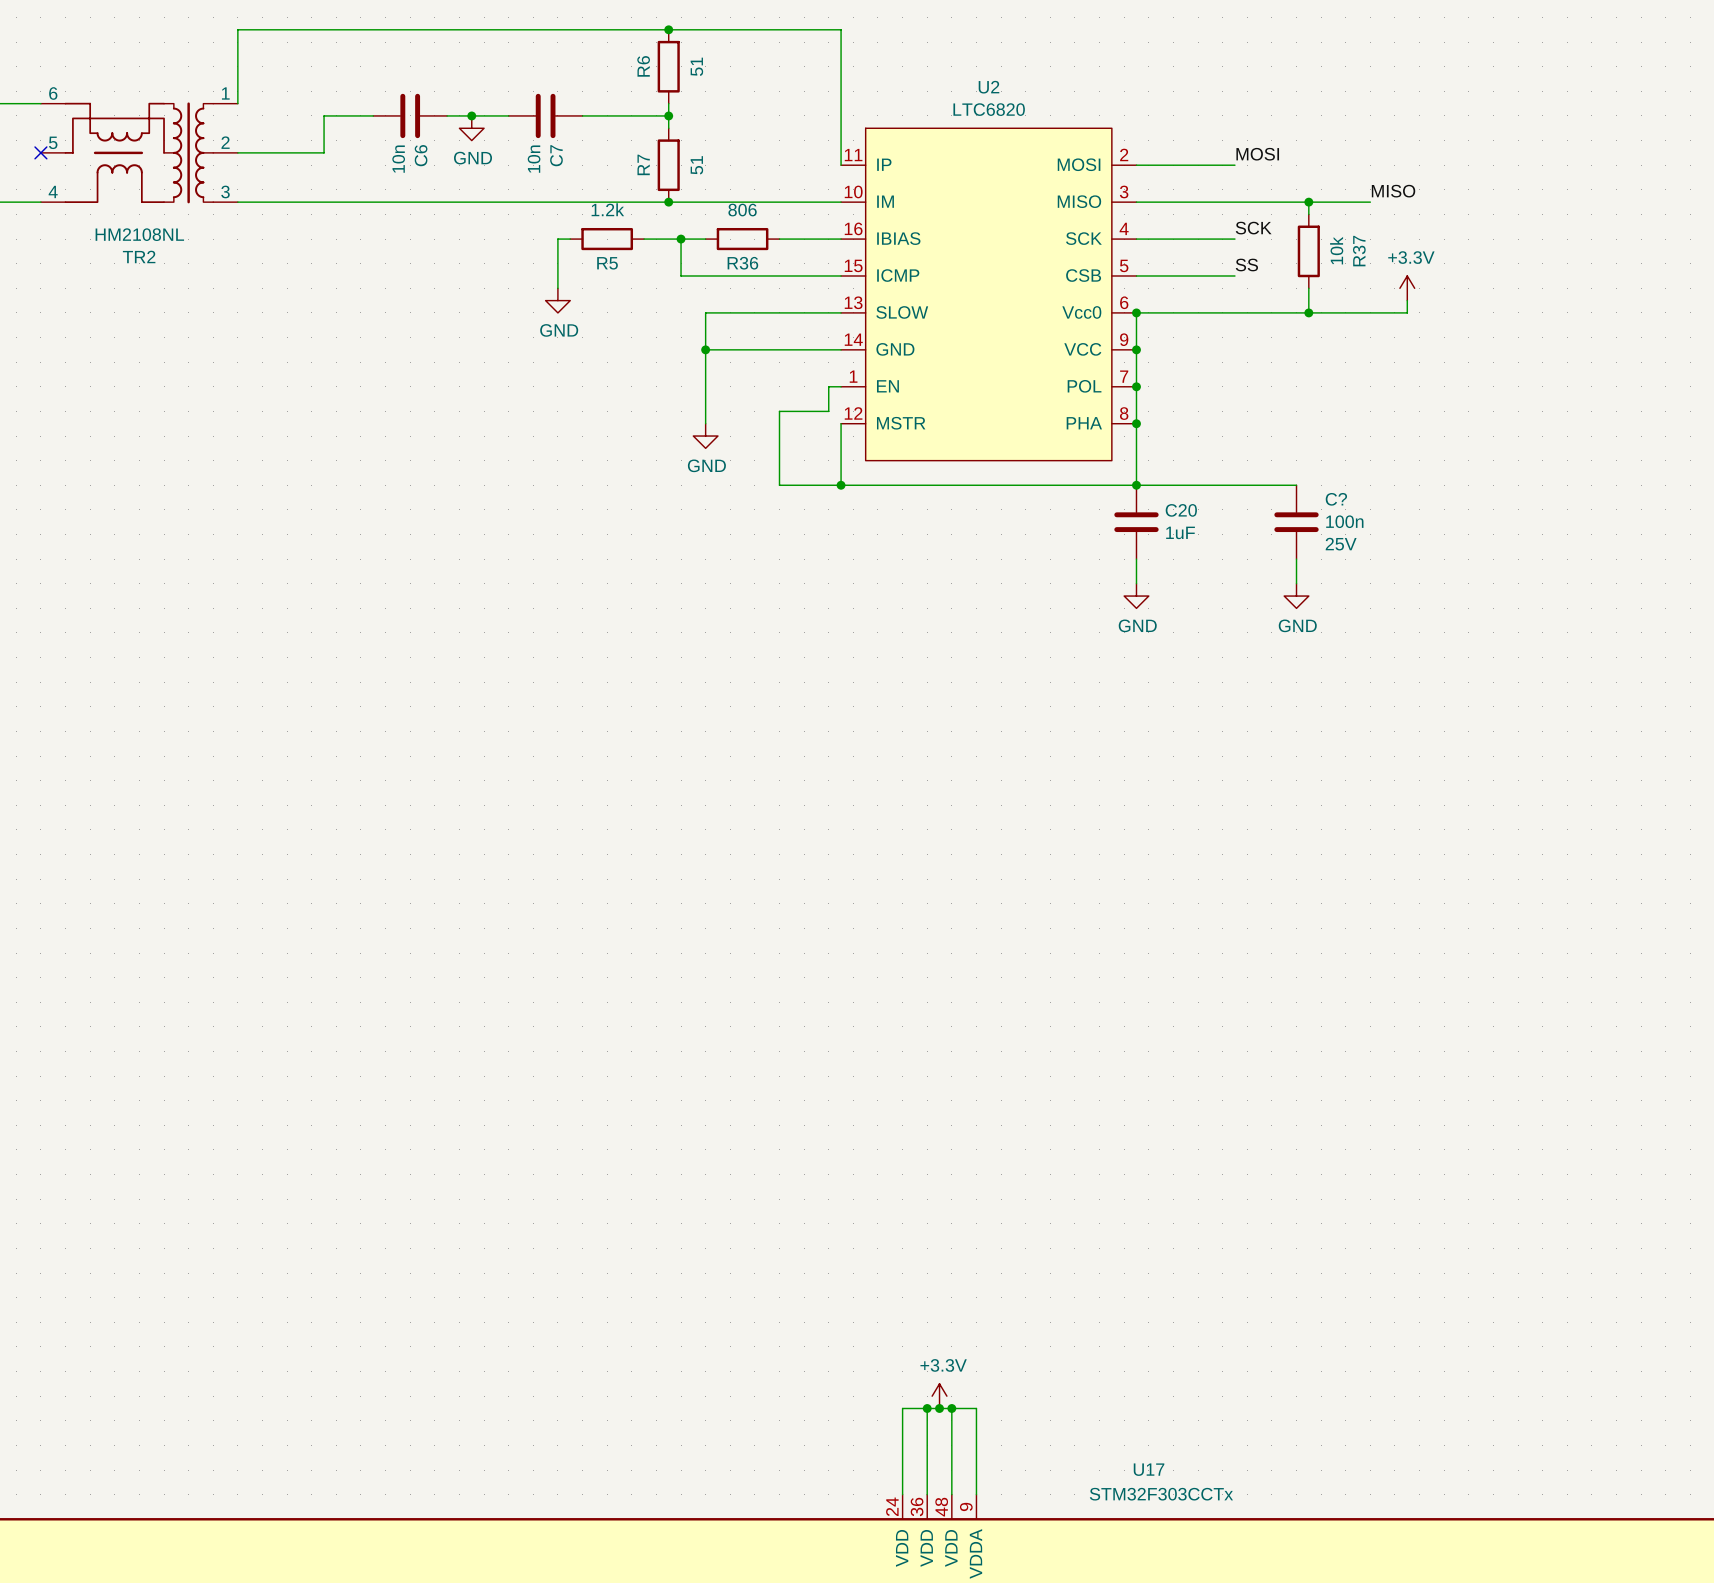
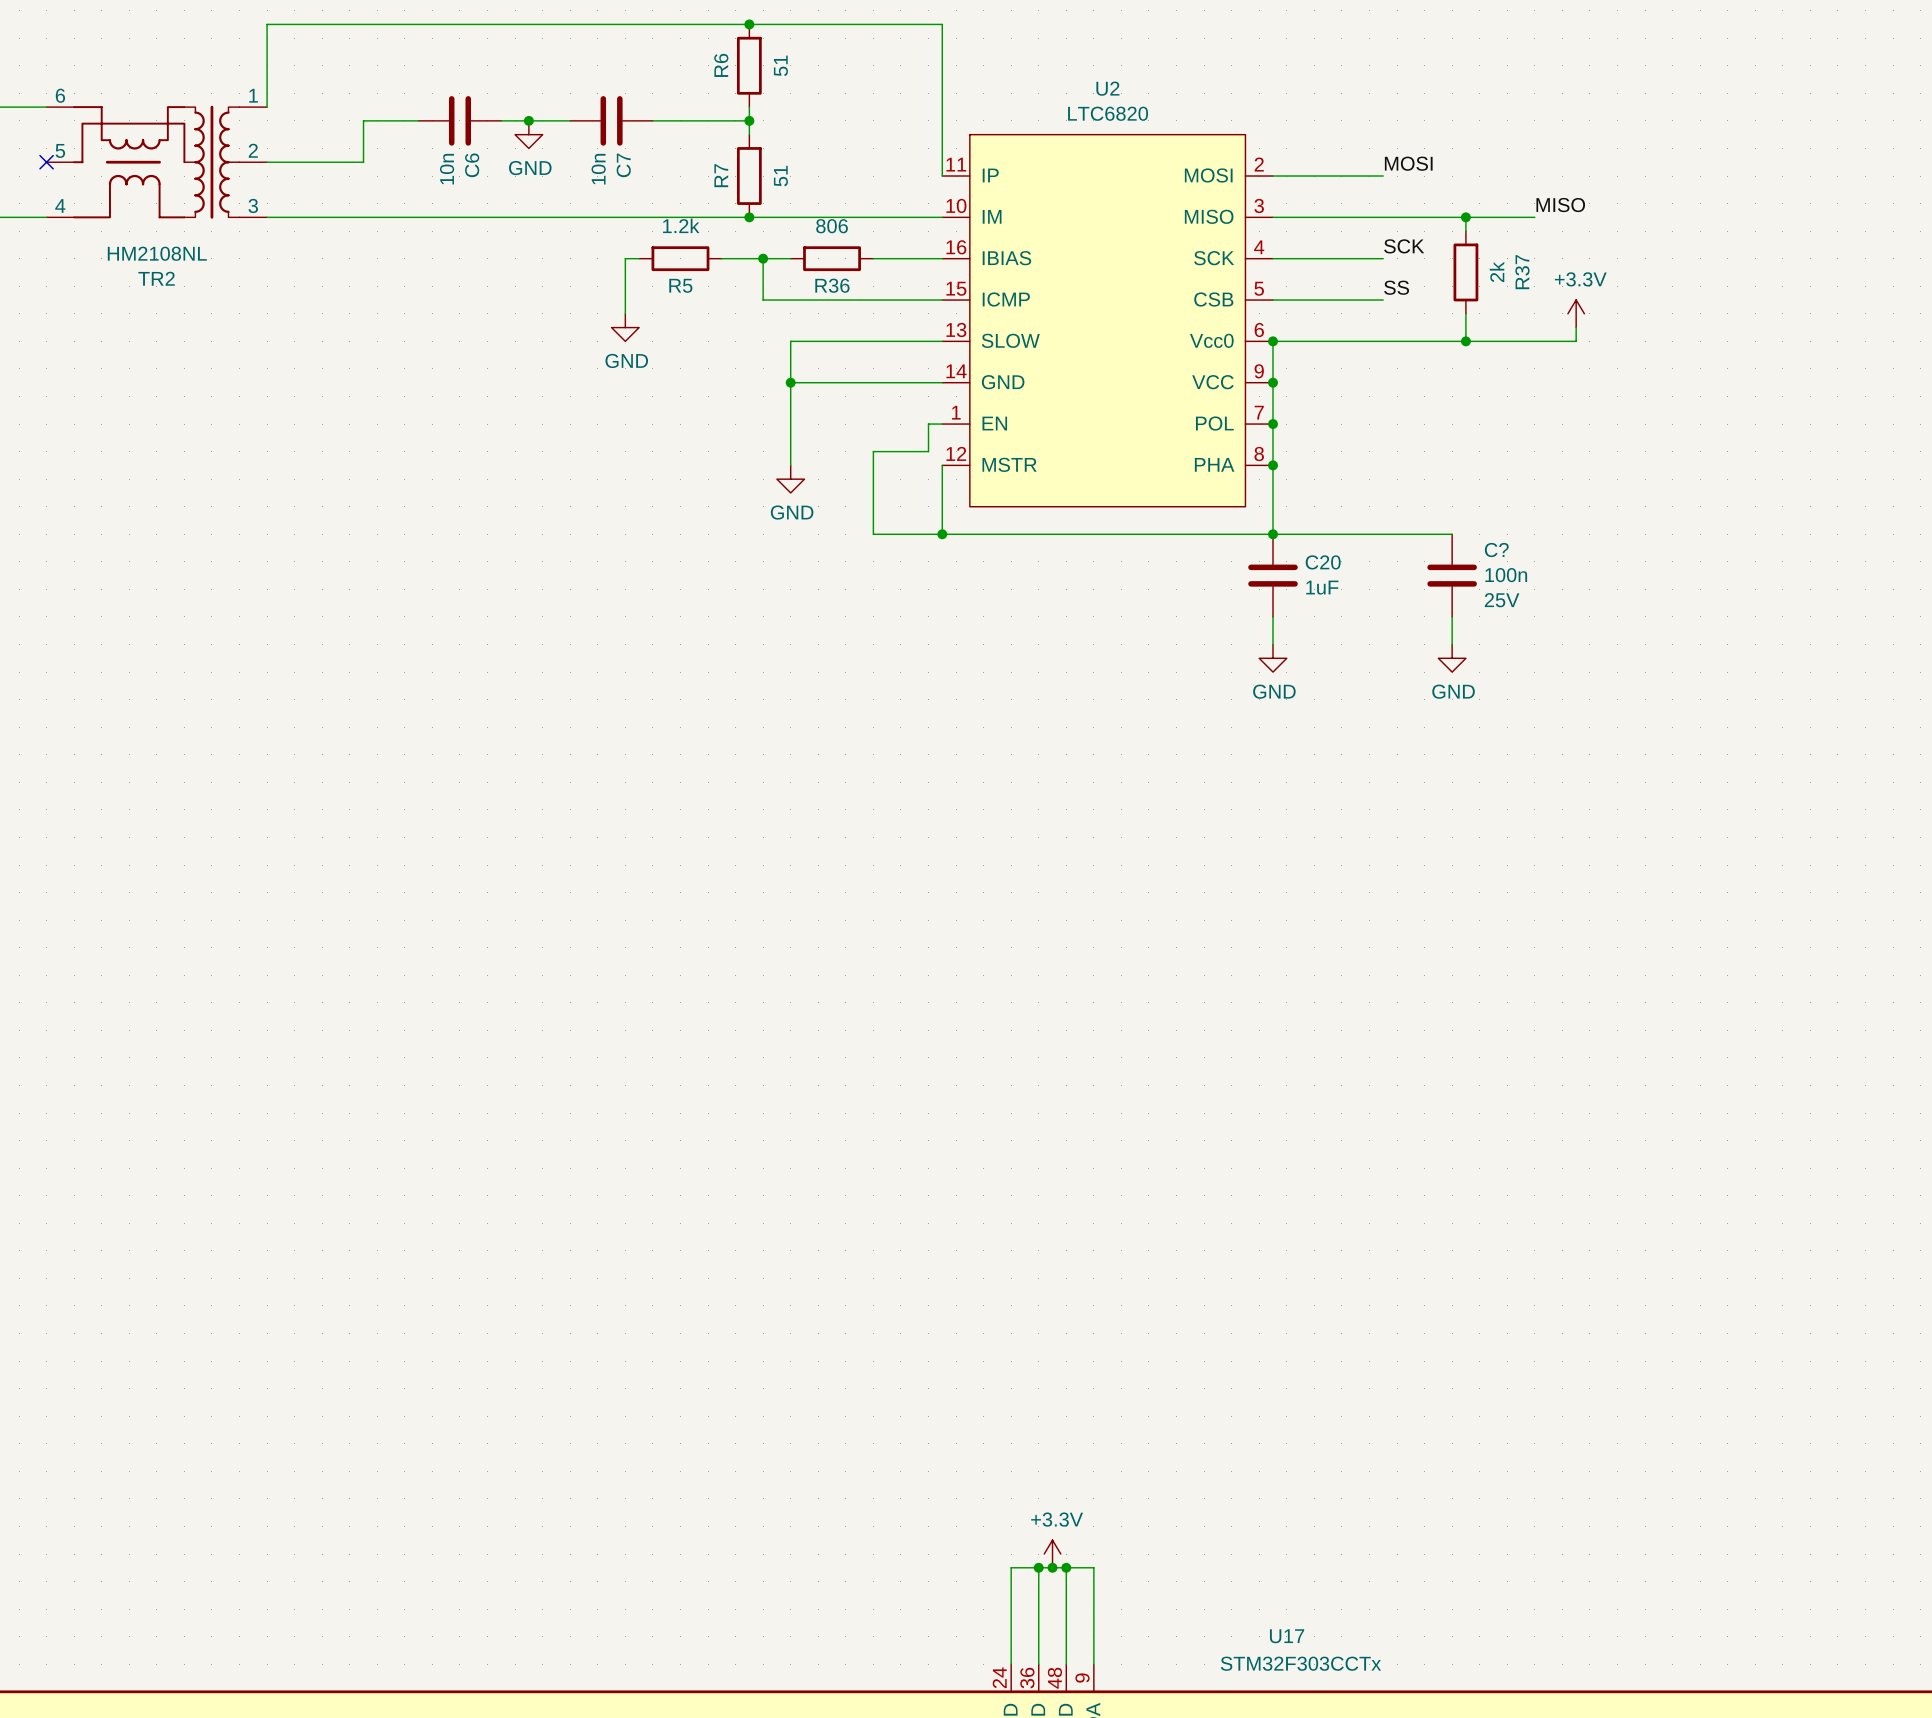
R37 value: 10k (1336, 250) -> 2k (1497, 271)

